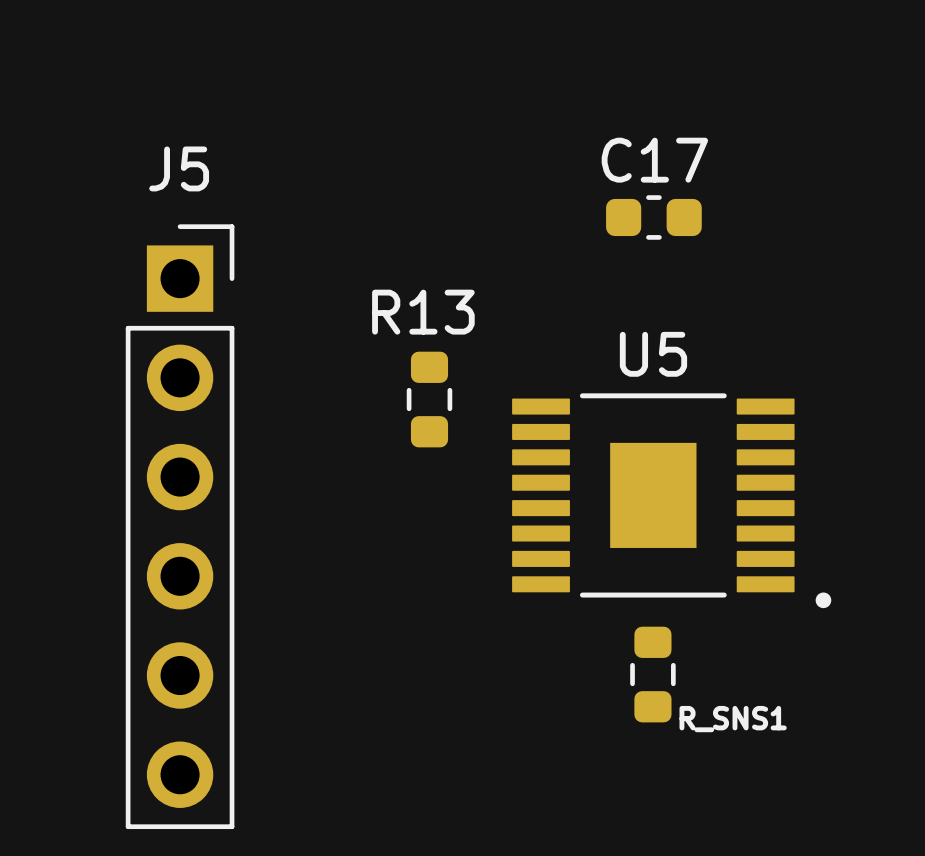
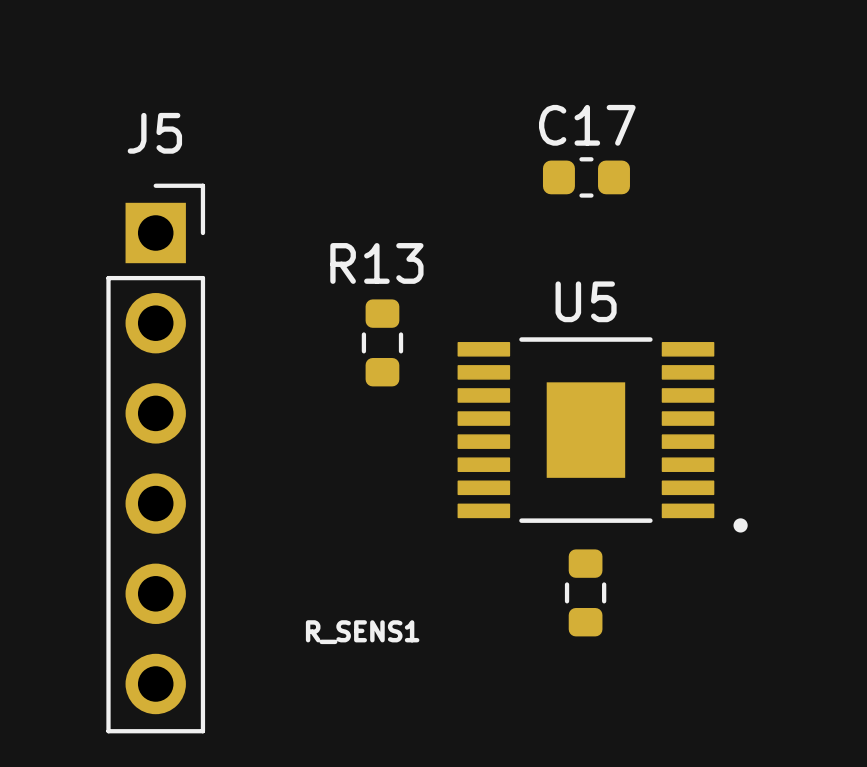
R_SNS1 name: R_SNS1 (733, 719) -> R_SENS1 (362, 632)

